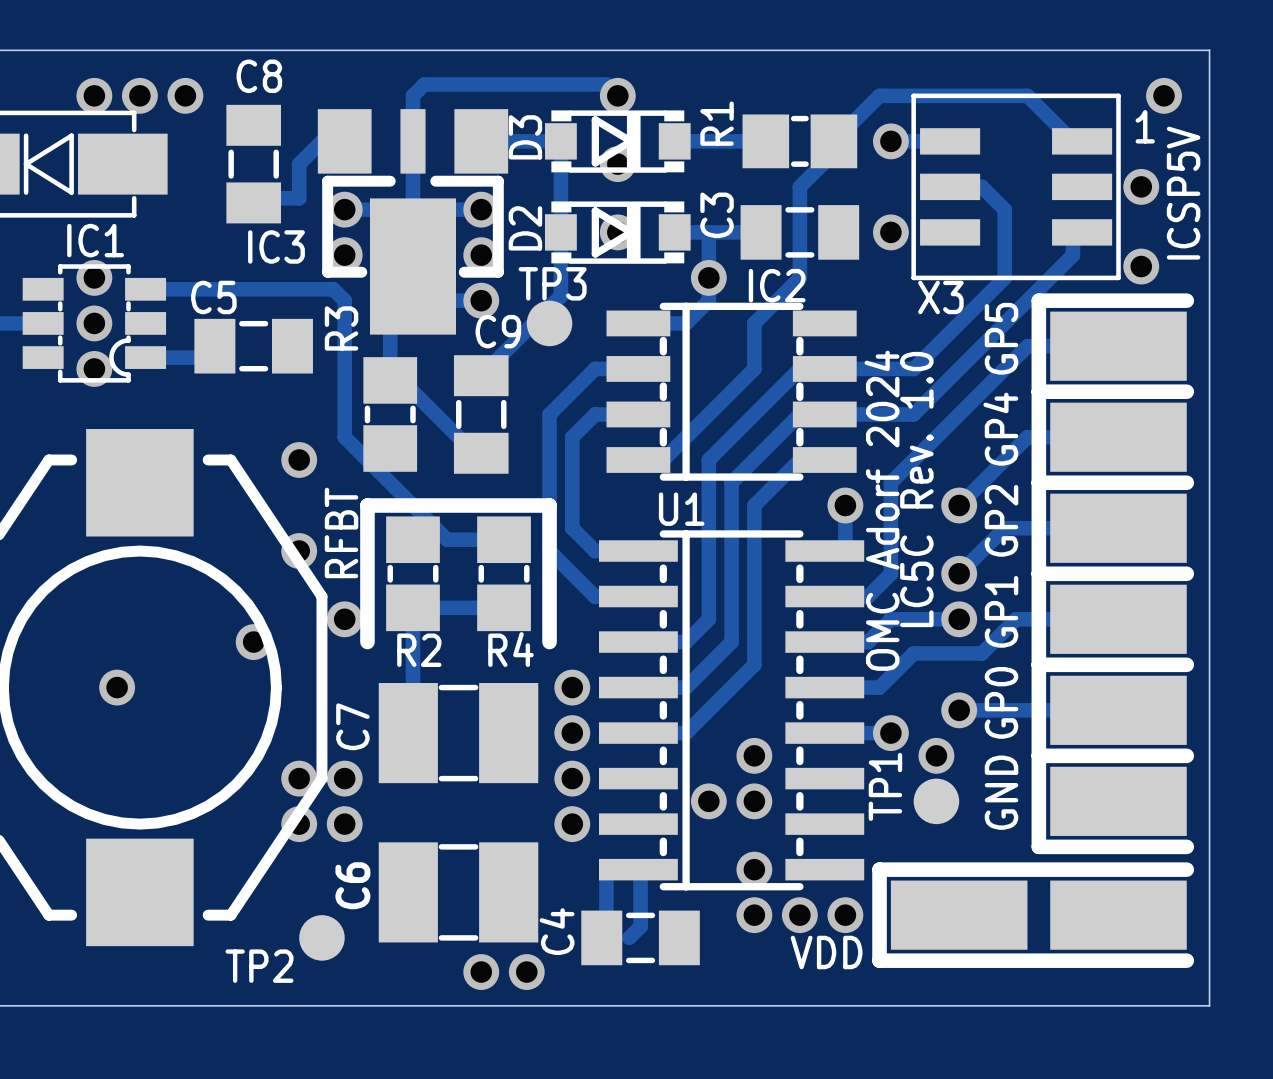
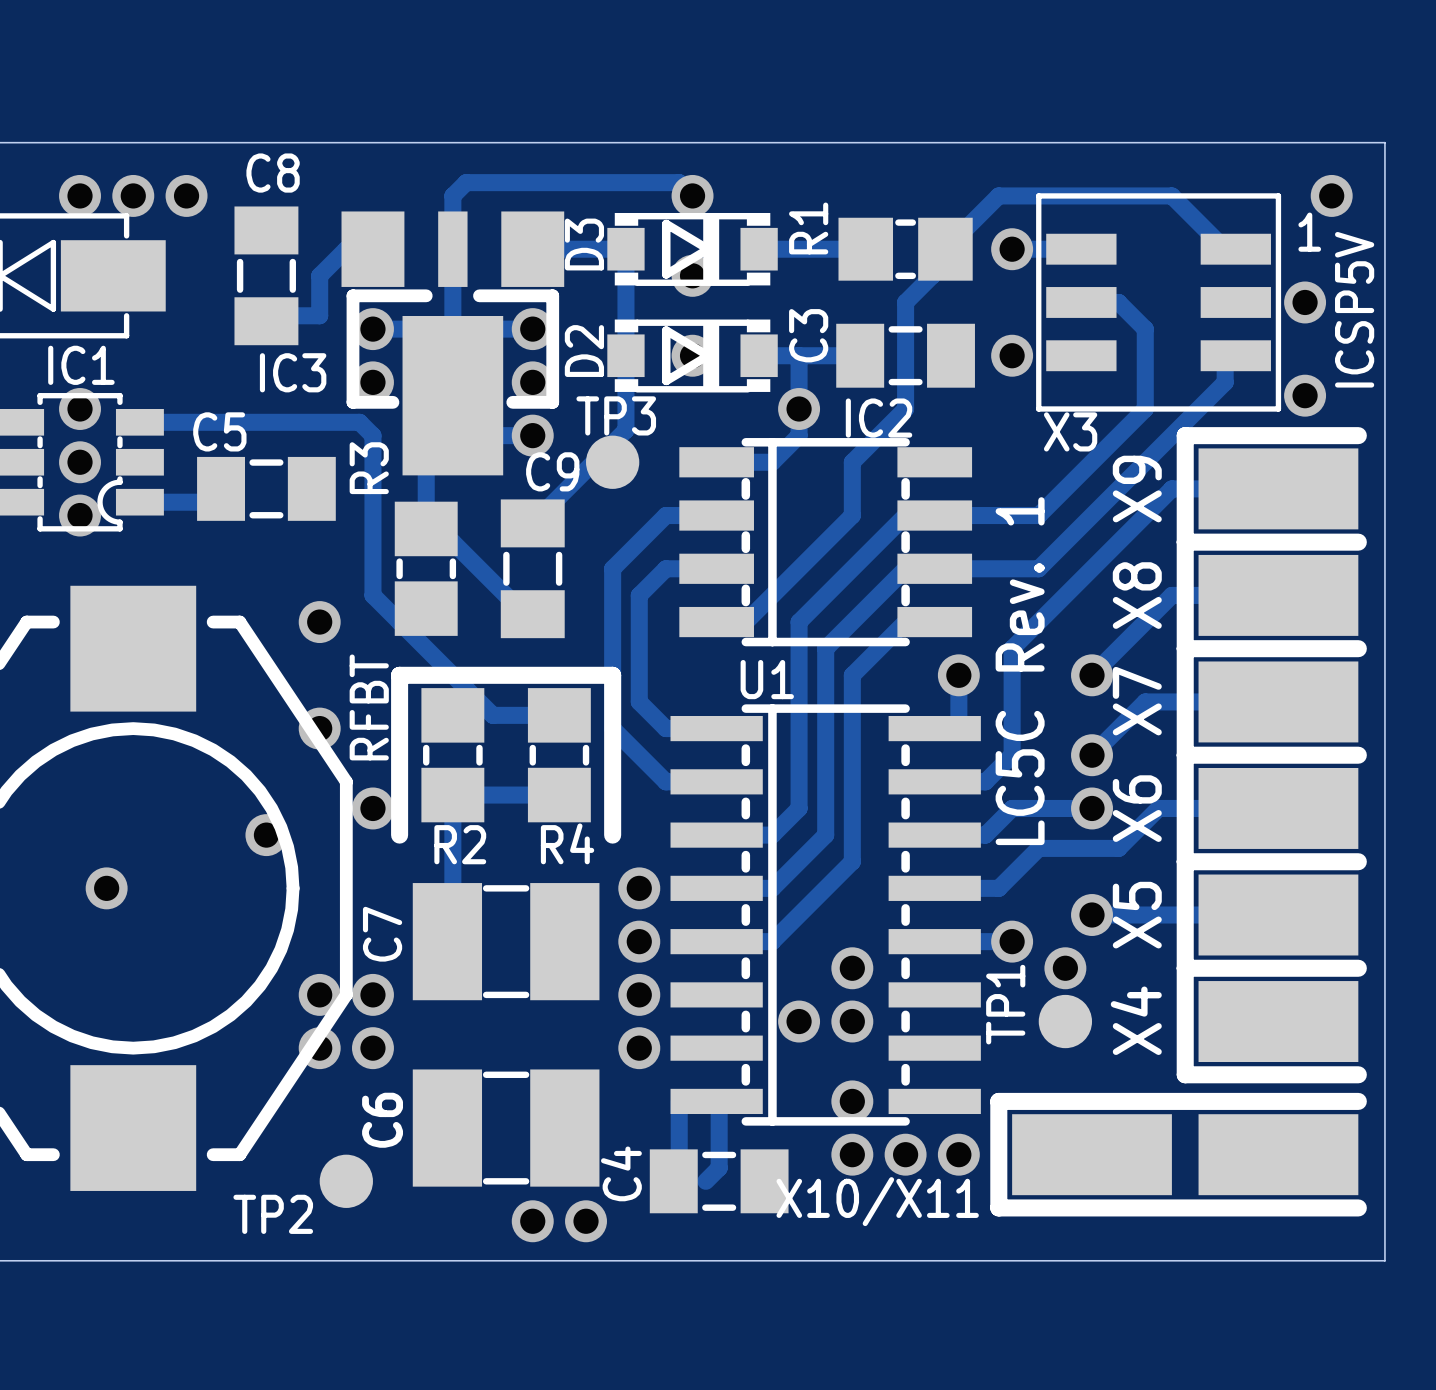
text: GP5 (1001, 338) -> X9 (1137, 489)
text: GP4 (1000, 429) -> X8 (1137, 595)
text: LC5C Rev. 1.0 (916, 489) -> none
text: OMC Adorf 2024 (882, 510) -> LC5C Rev. 1 (1020, 671)
text: GP2 (1001, 520) -> X7 (1137, 701)
text: GP1 (1001, 611) -> X6 (1137, 808)
text: GP0 (1001, 702) -> X5 (1137, 915)
text: GND (1001, 792) -> X4 (1136, 1020)
text: VDD (826, 952) -> X10/X11 (877, 1201)

